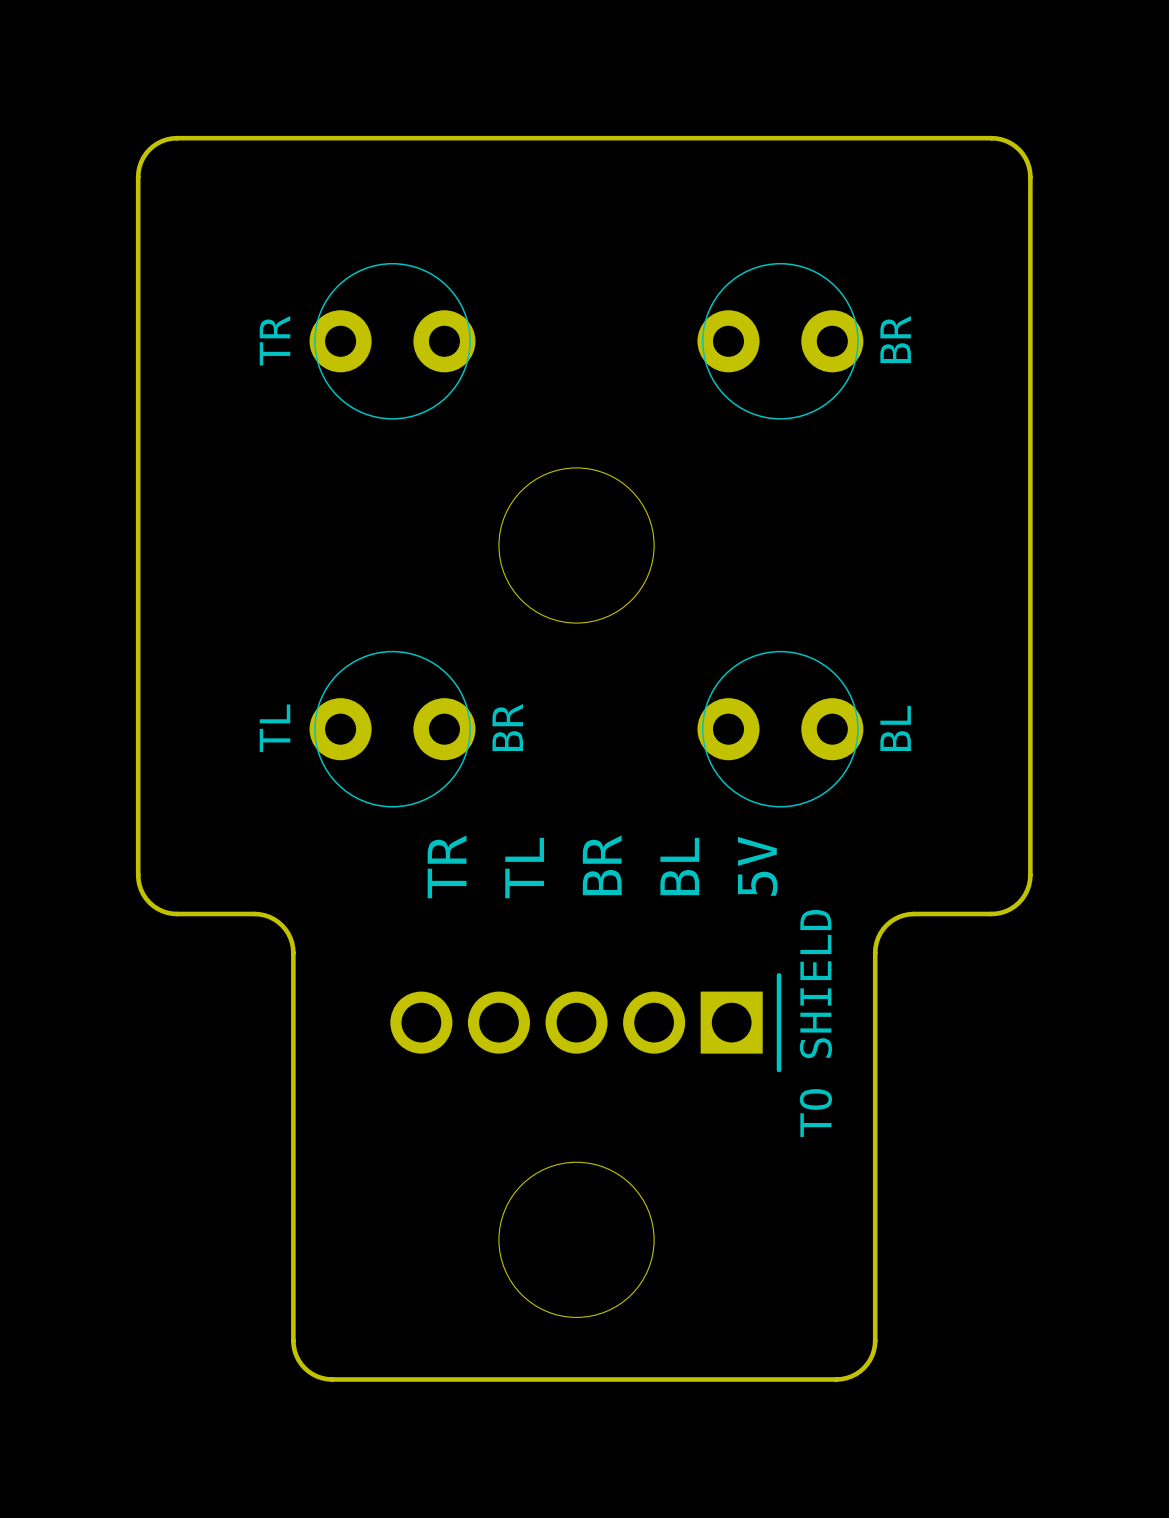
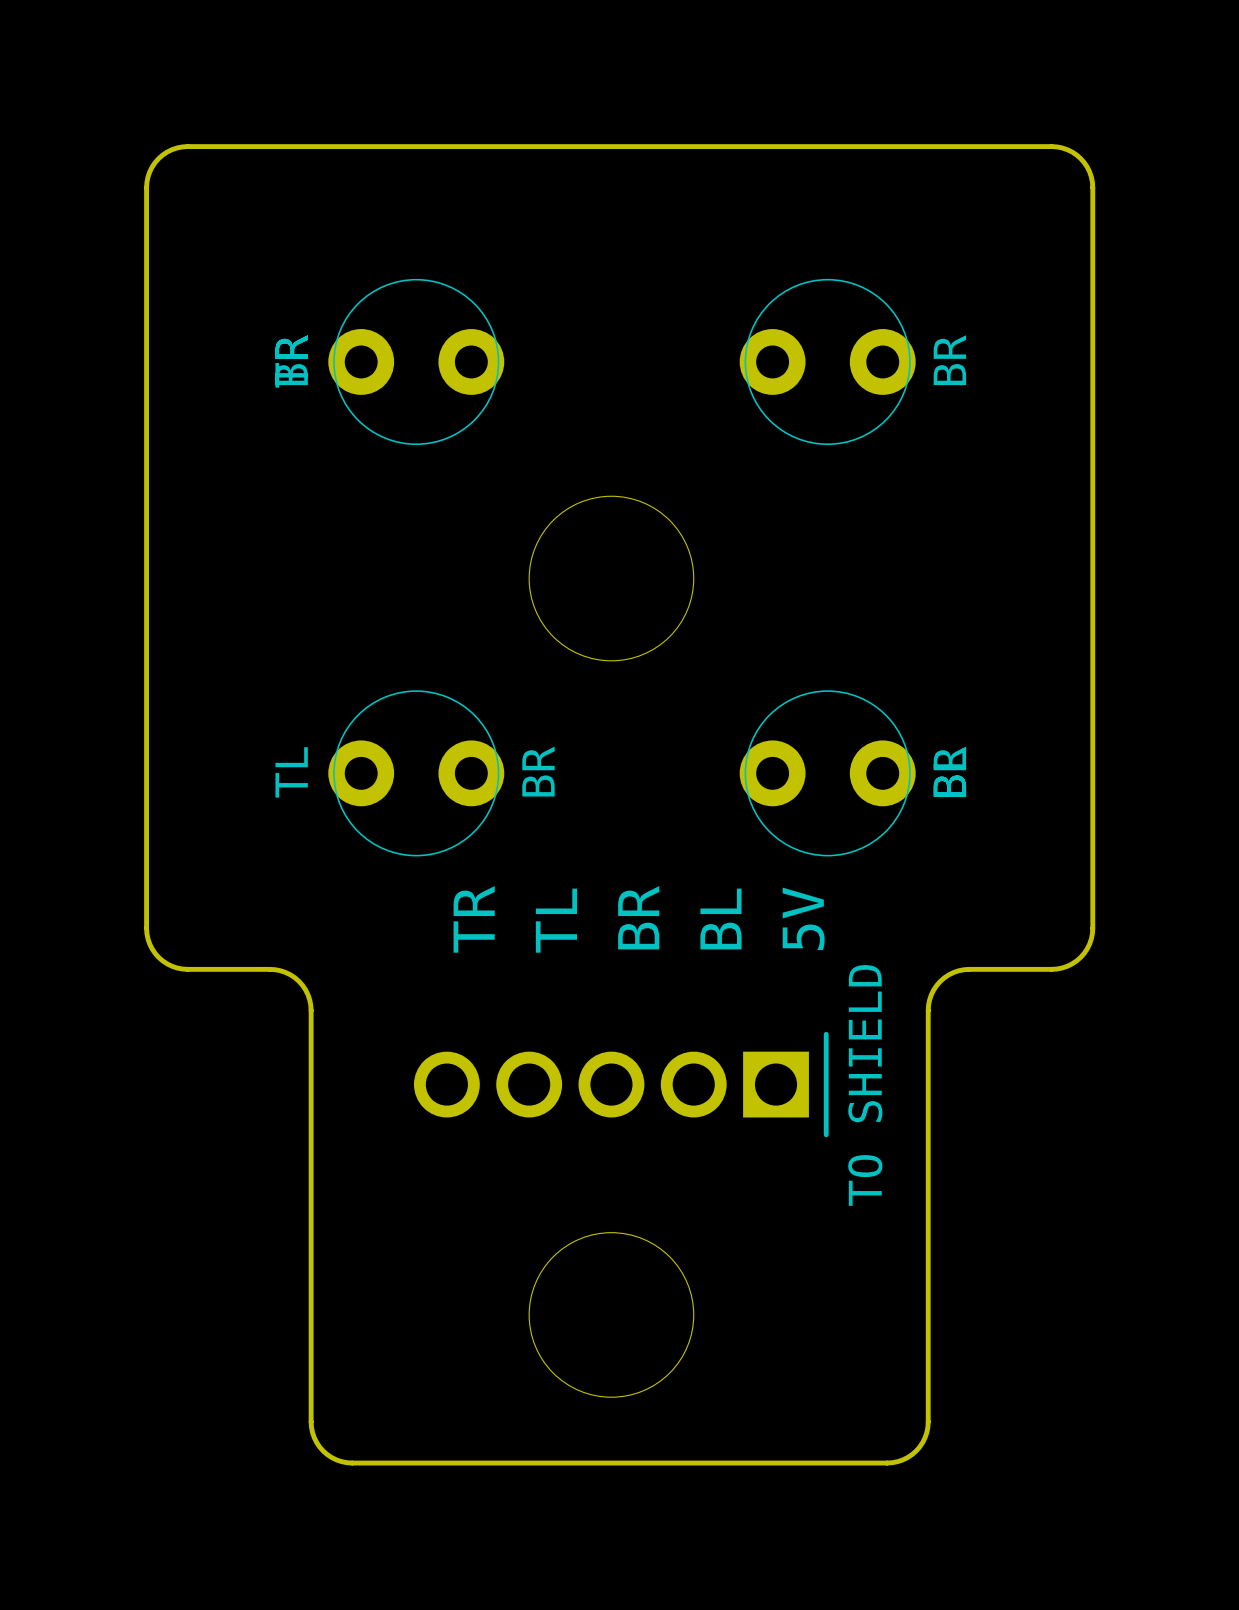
part footprint: [309, 262, 476, 420] -> [328, 278, 505, 446]
part footprint: [697, 650, 864, 808] -> [739, 690, 916, 857]

